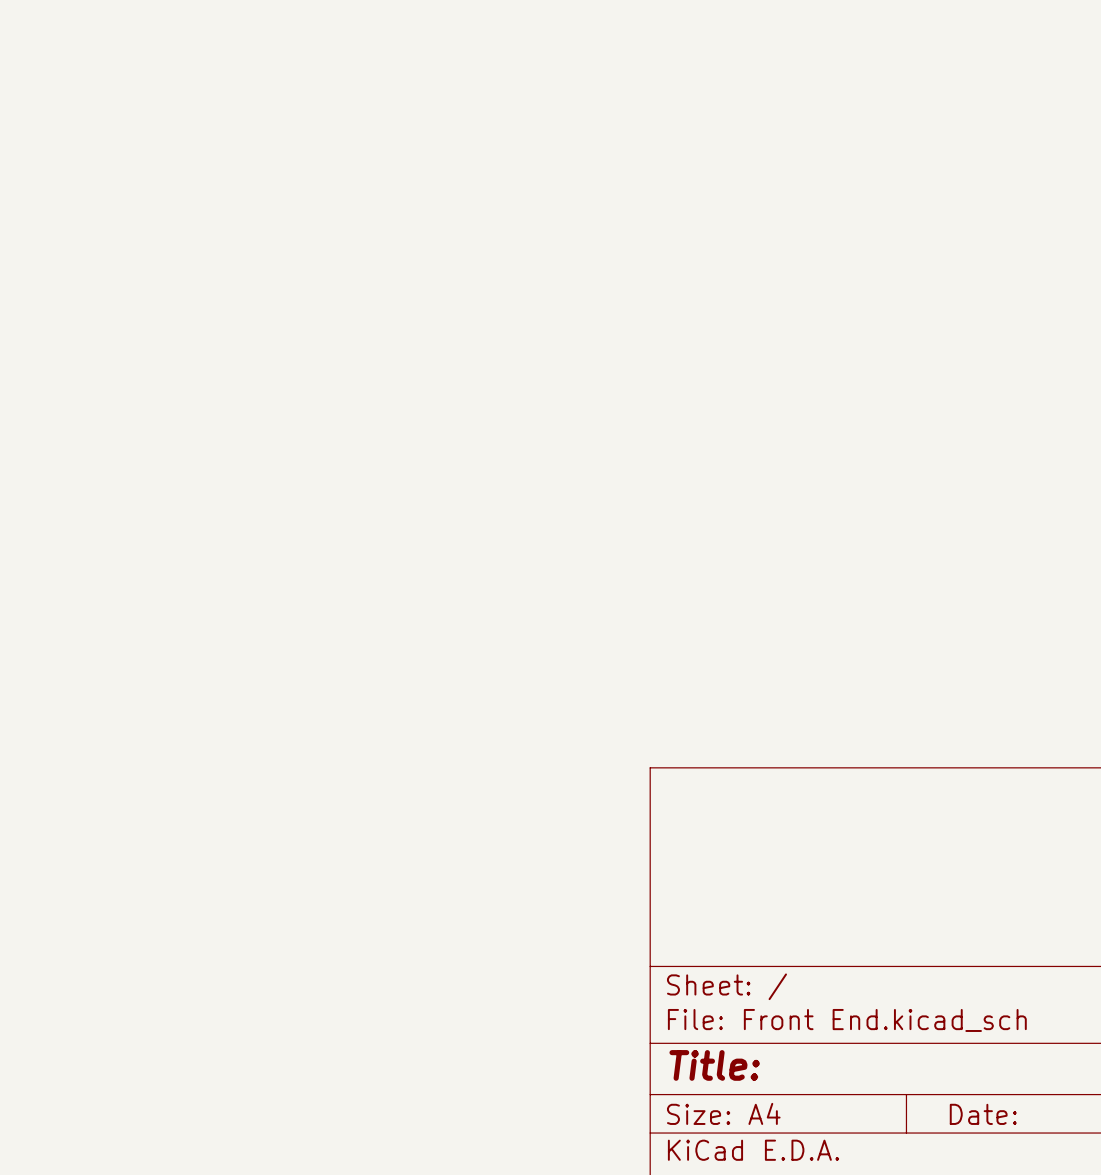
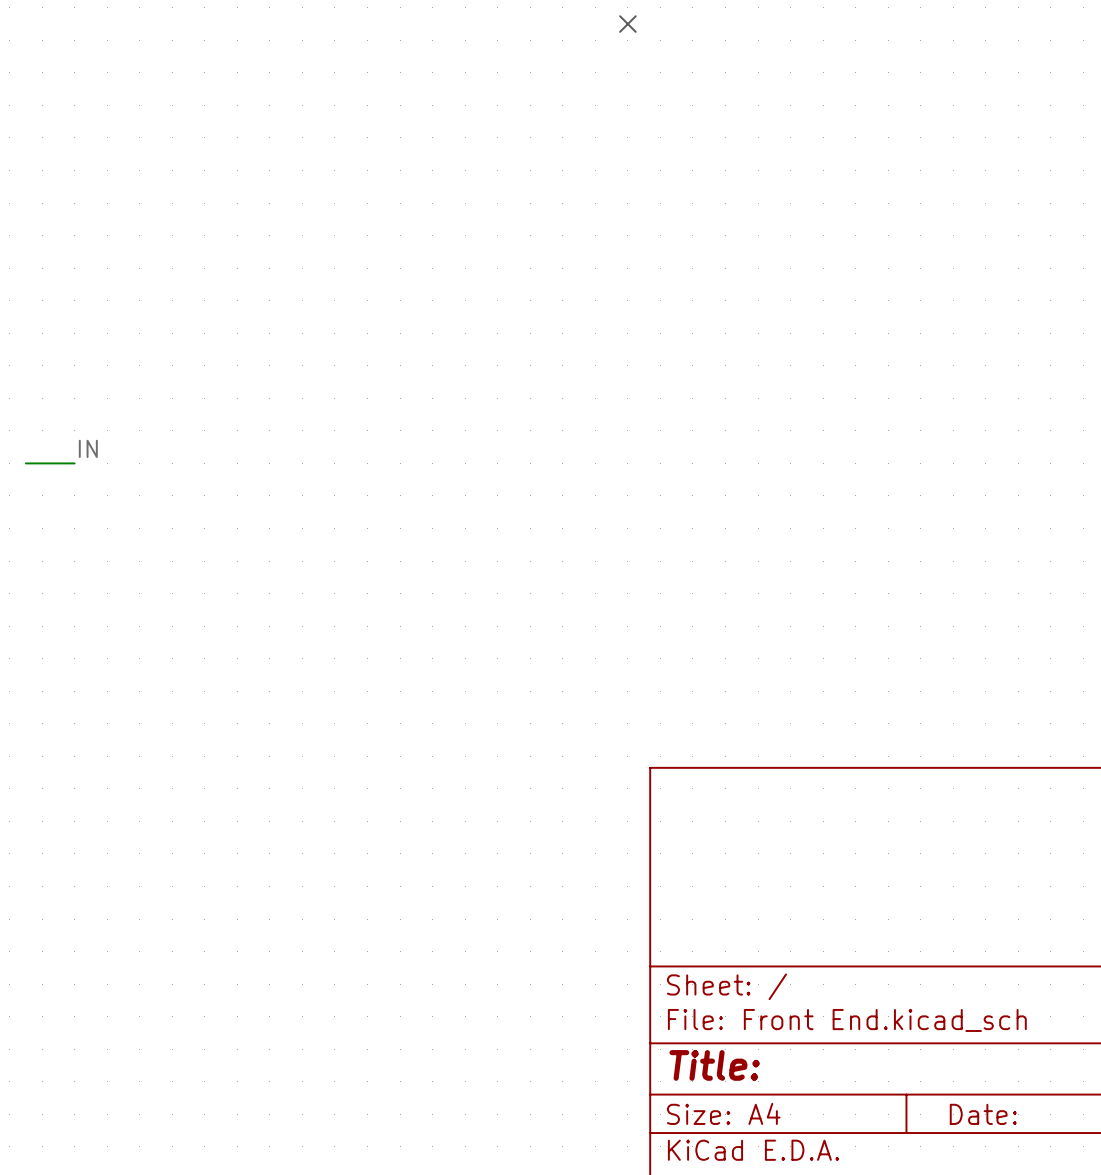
no-connect mark: none -> (627, 24)
label: none -> IN (88, 448)
wire: none -> (25, 463) (74, 463)

